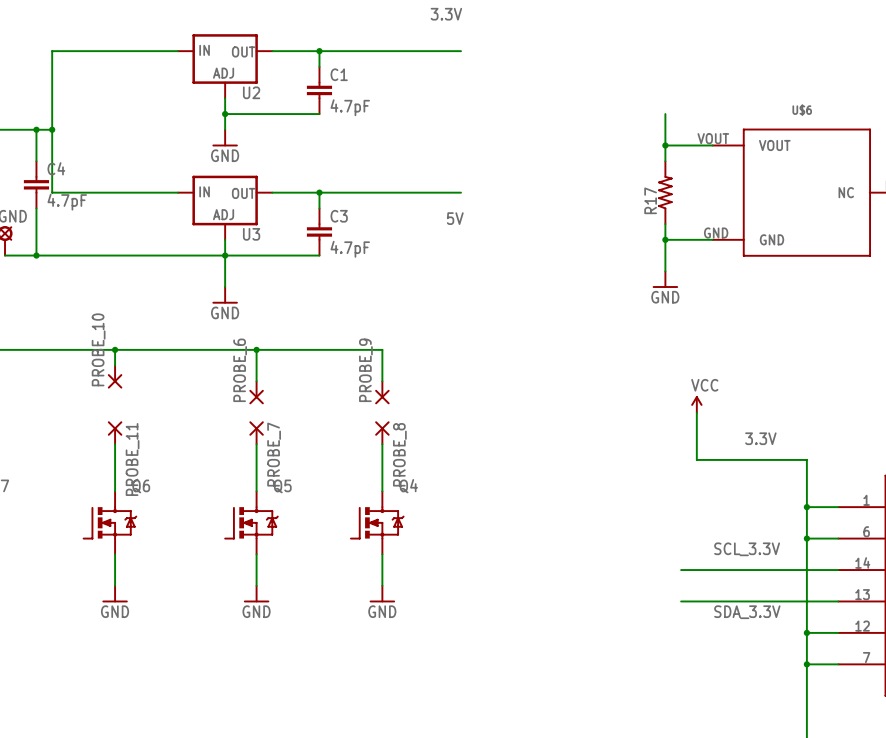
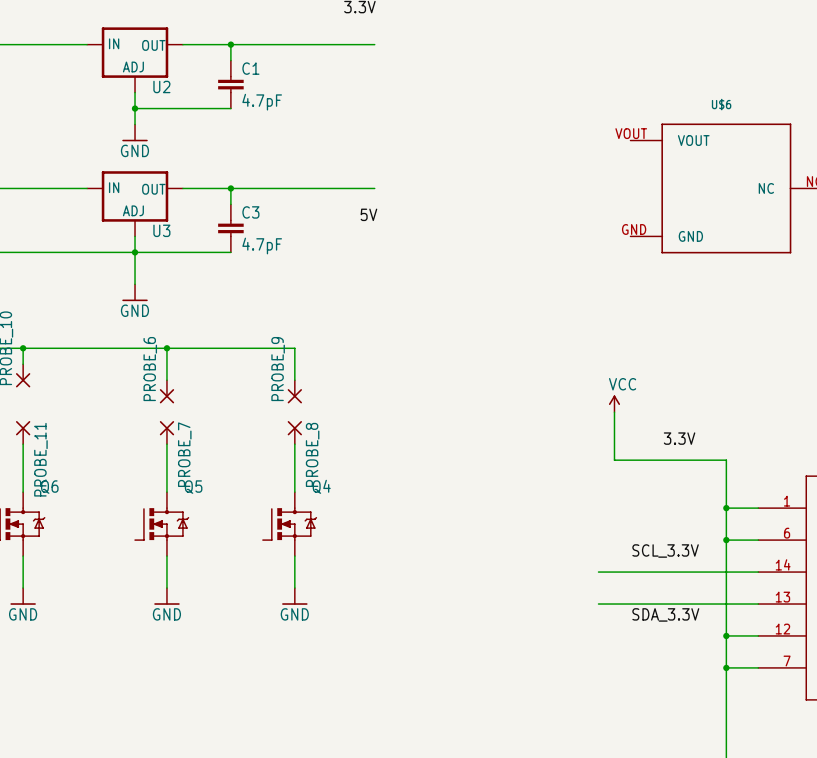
wire: (665, 114) (665, 161) -> none
wire: (665, 145) (712, 145) -> none
junction: (665, 145) -> none
R17: (665, 192) -> none
wire: (665, 224) (665, 271) -> none
wire: (665, 239) (712, 239) -> none
junction: (665, 239) -> none
power symbol: GND (665, 279) -> none

